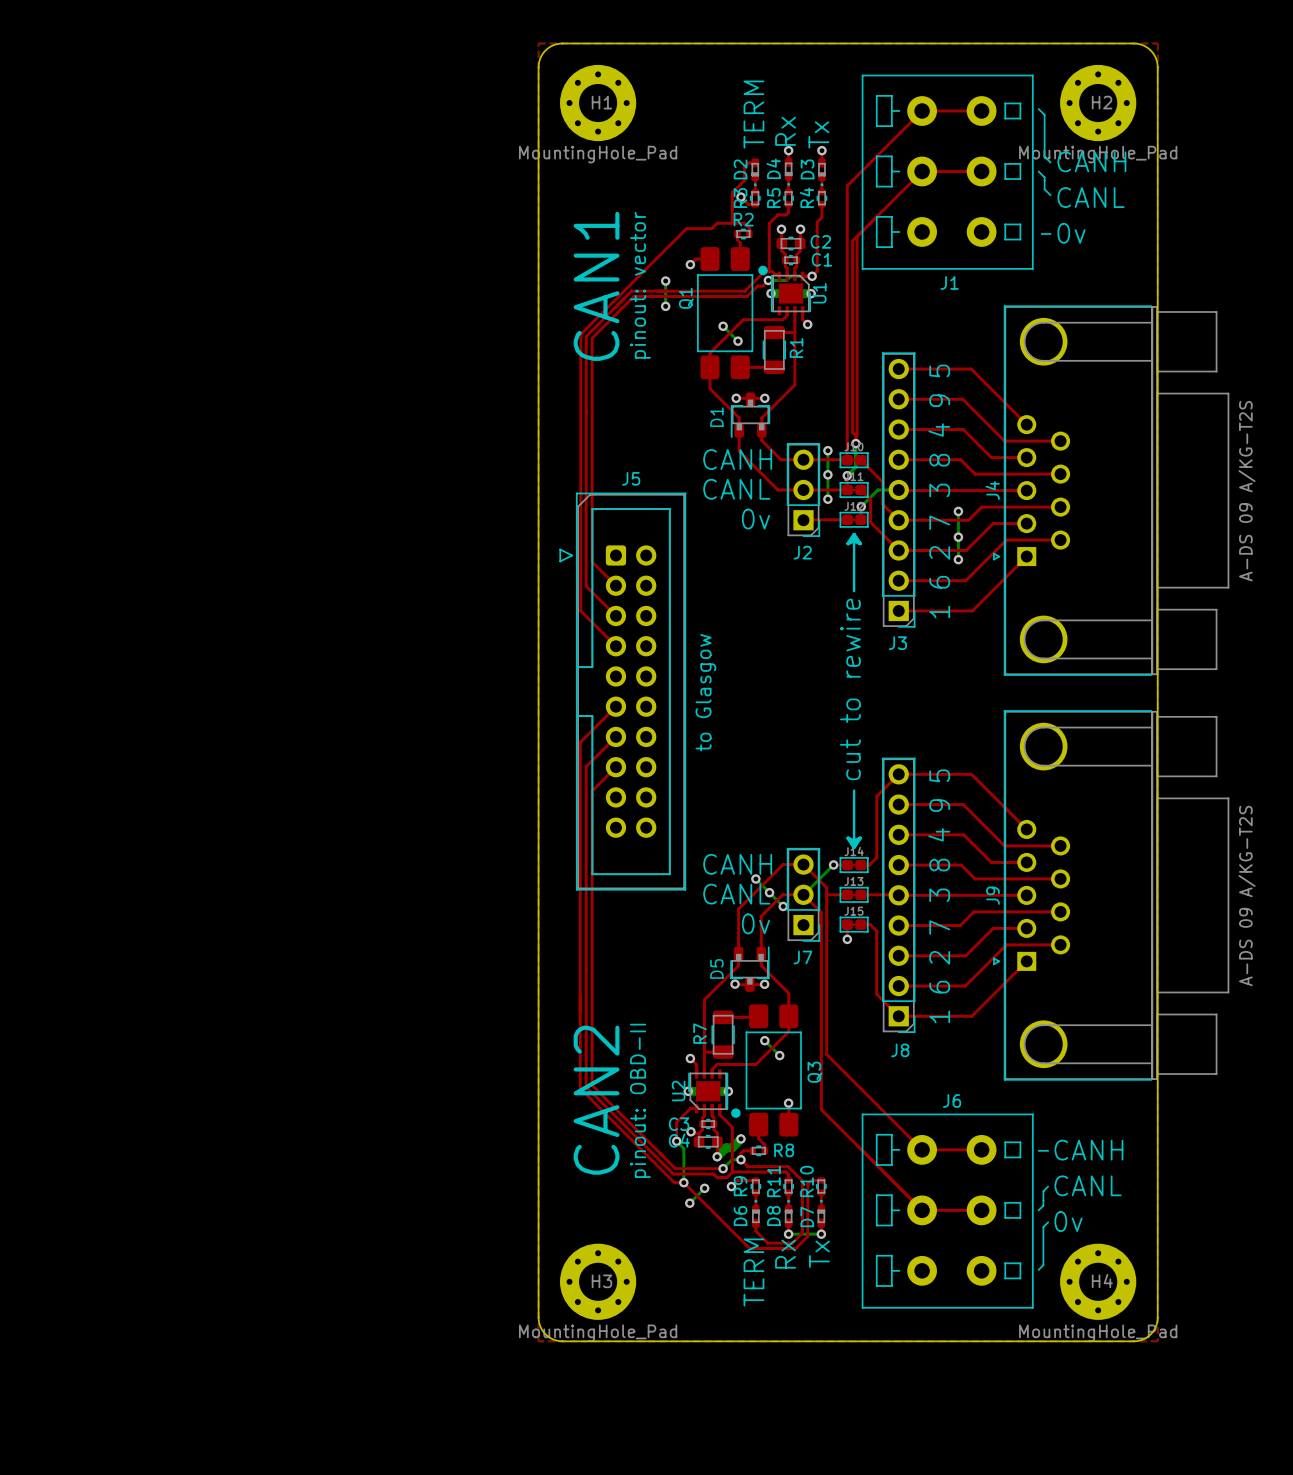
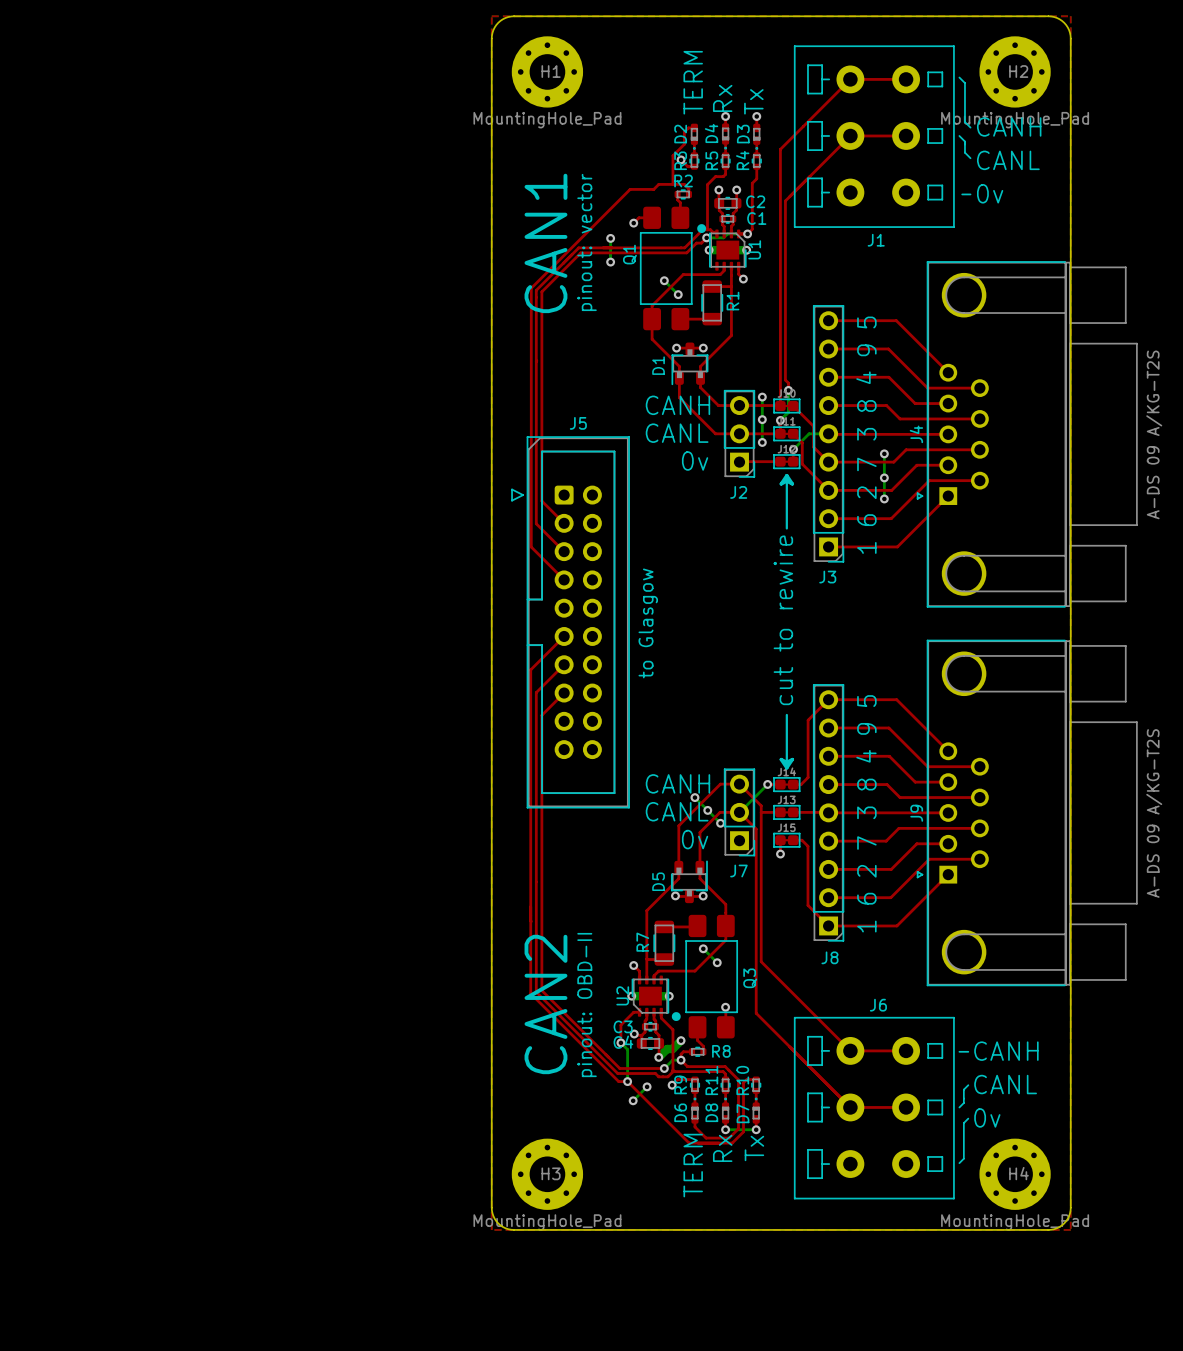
top track: (857, 236) (857, 436) -> none

